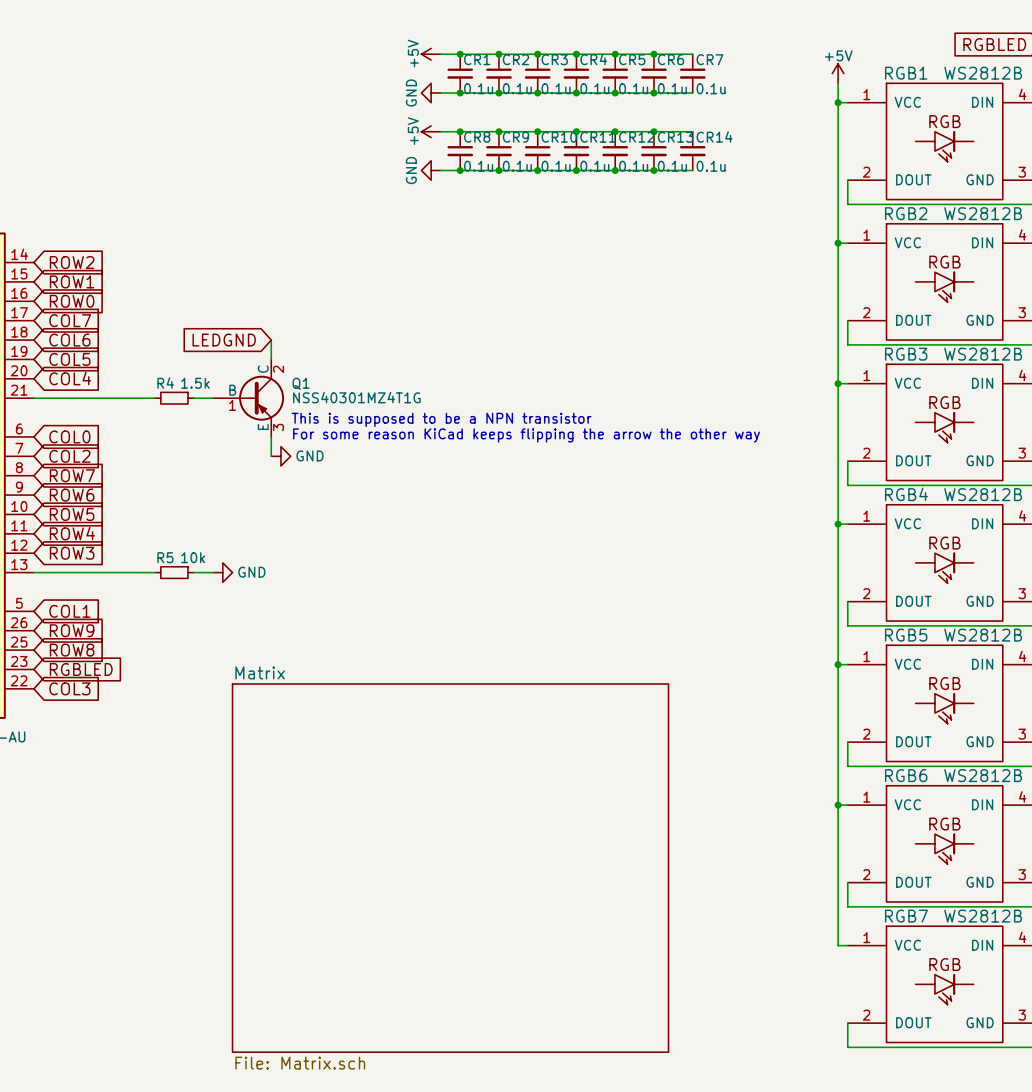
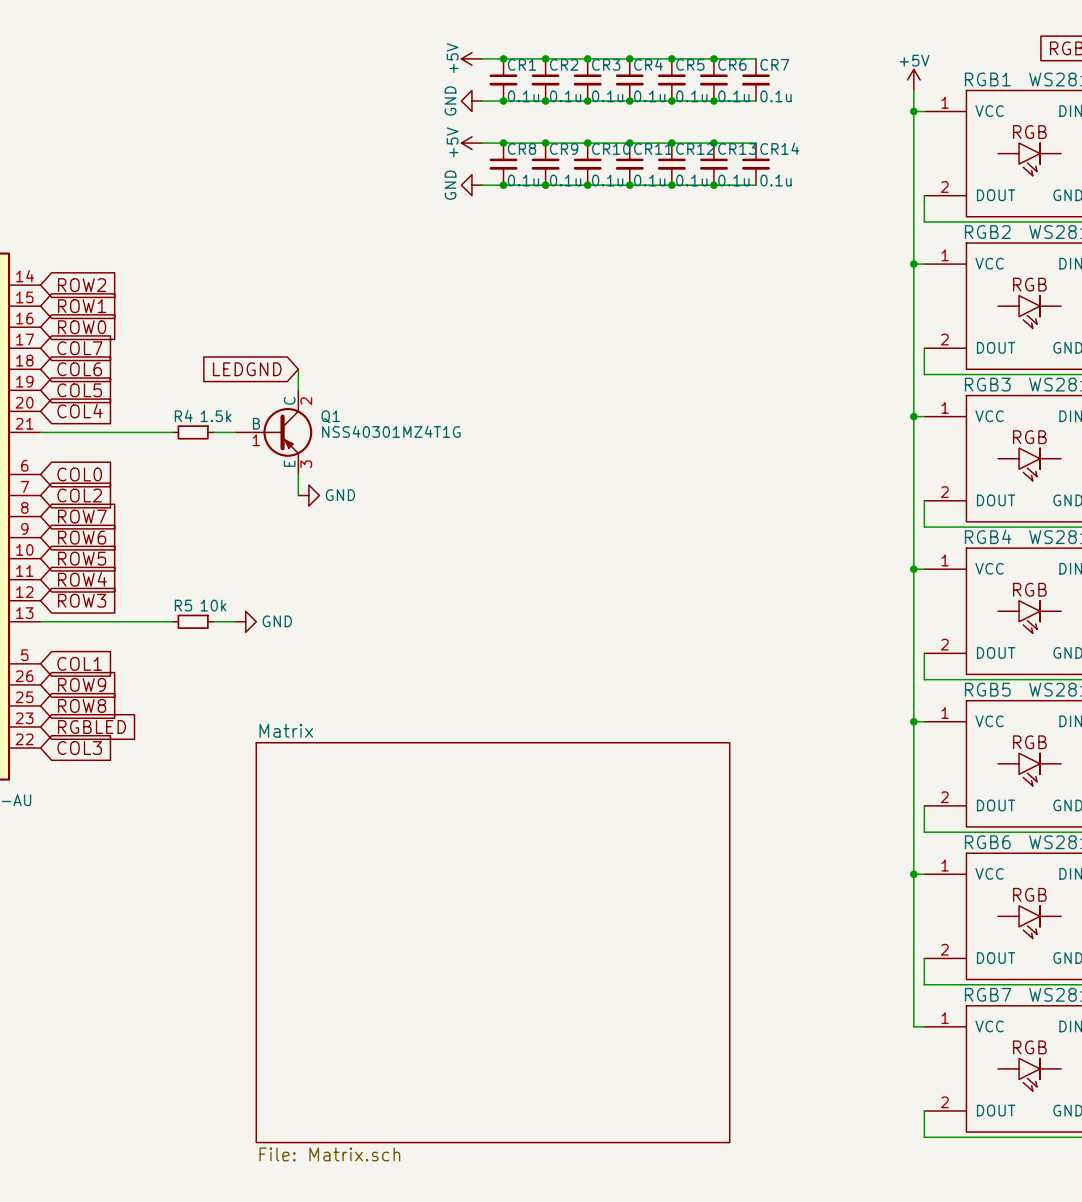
text: This is supposed to be a NPN transistor (441, 419) -> none
text: For some reason KiCad keeps flipping the arrow the other way (526, 435) -> none

